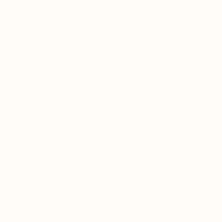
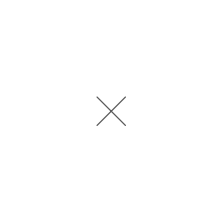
no-connect mark: none -> (111, 111)

